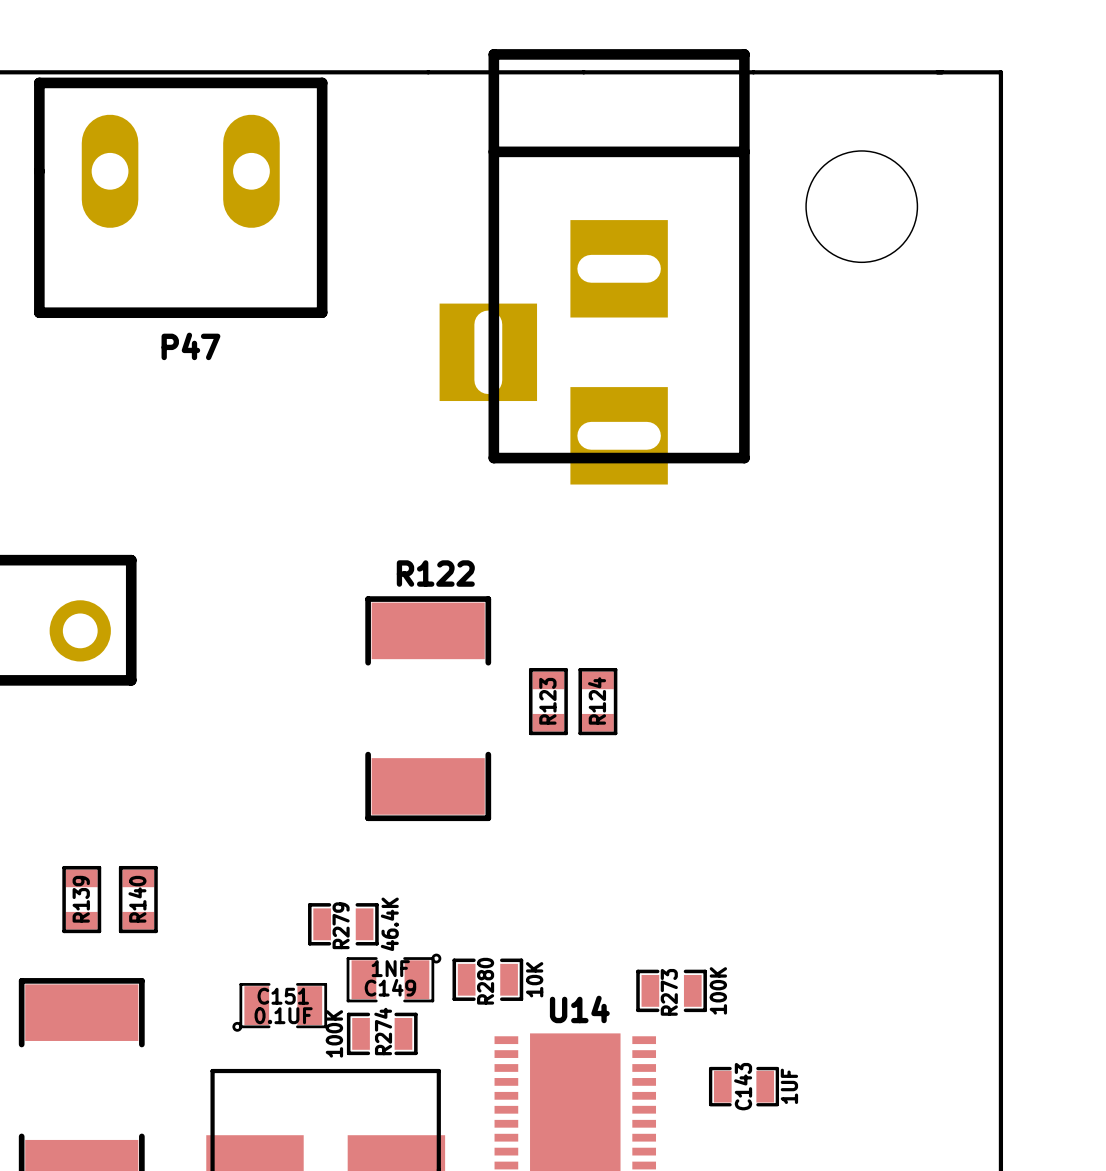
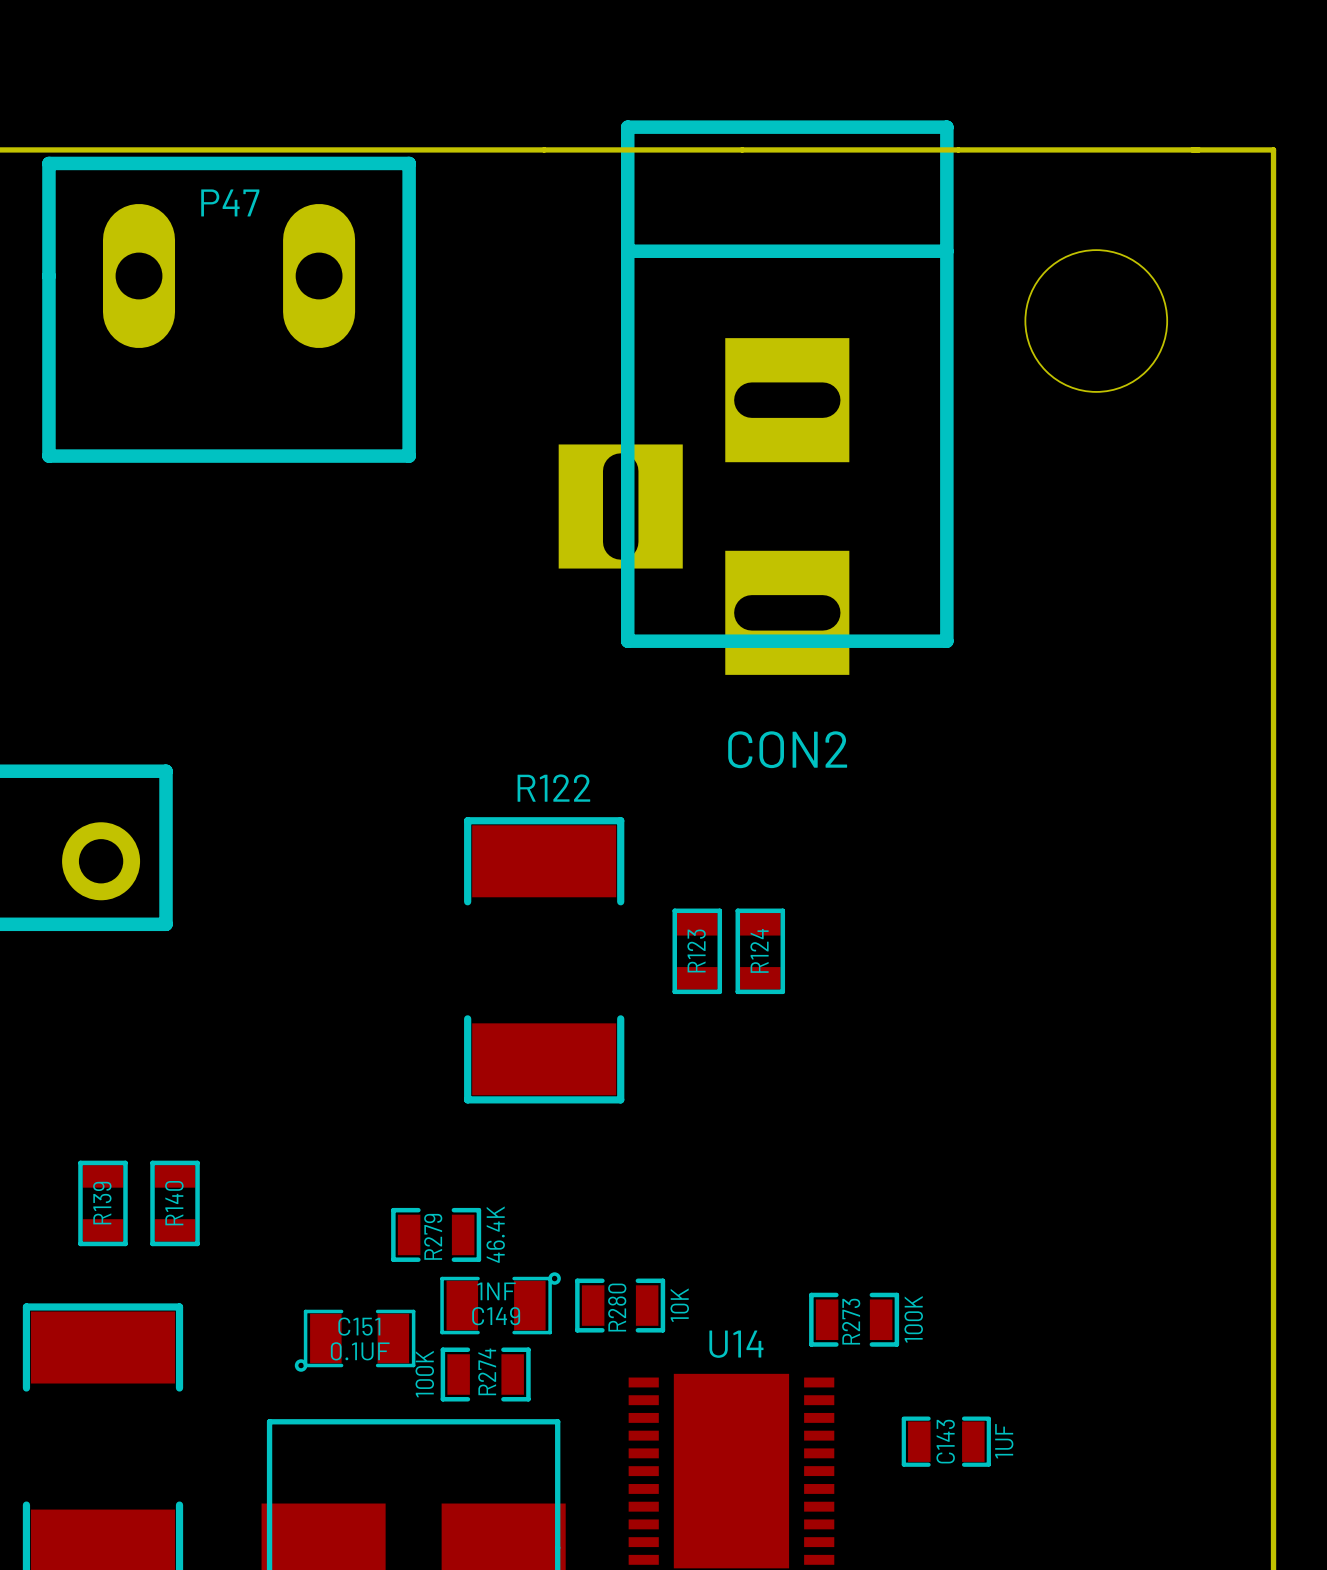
P47 name position: P47 (190, 346) -> P47 (230, 202)
CON2 name: none -> CON2 (787, 749)

